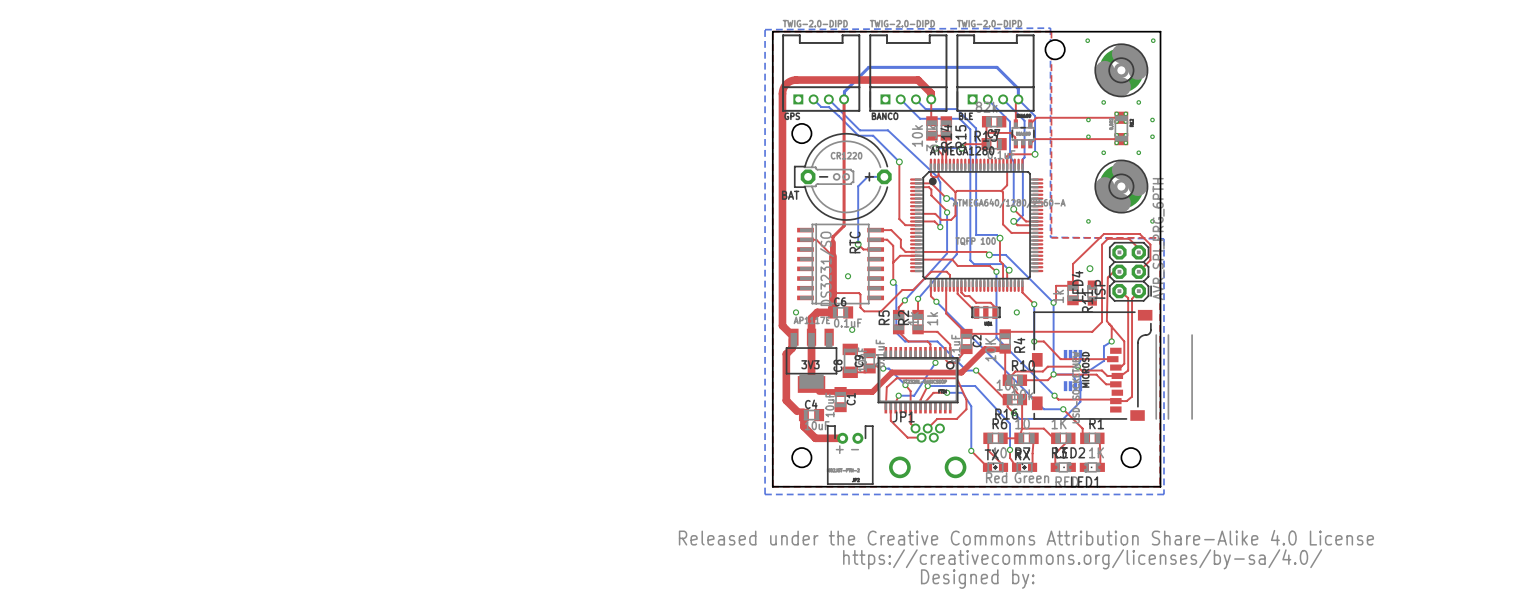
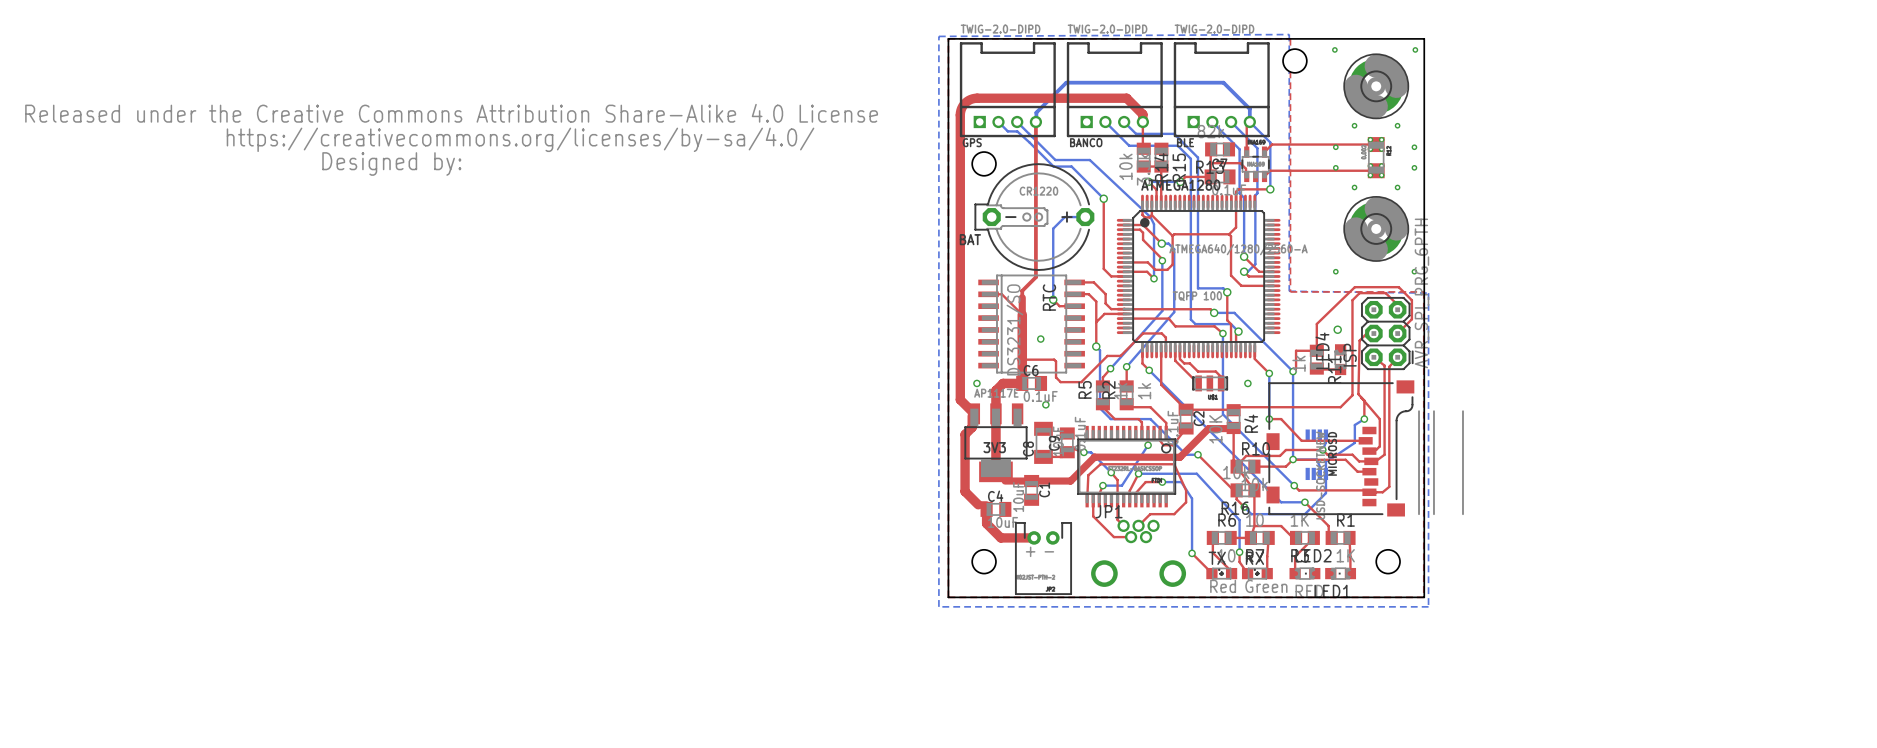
drawing: none -> [25, 103, 878, 176]
drawing: [679, 530, 1374, 589] -> none

